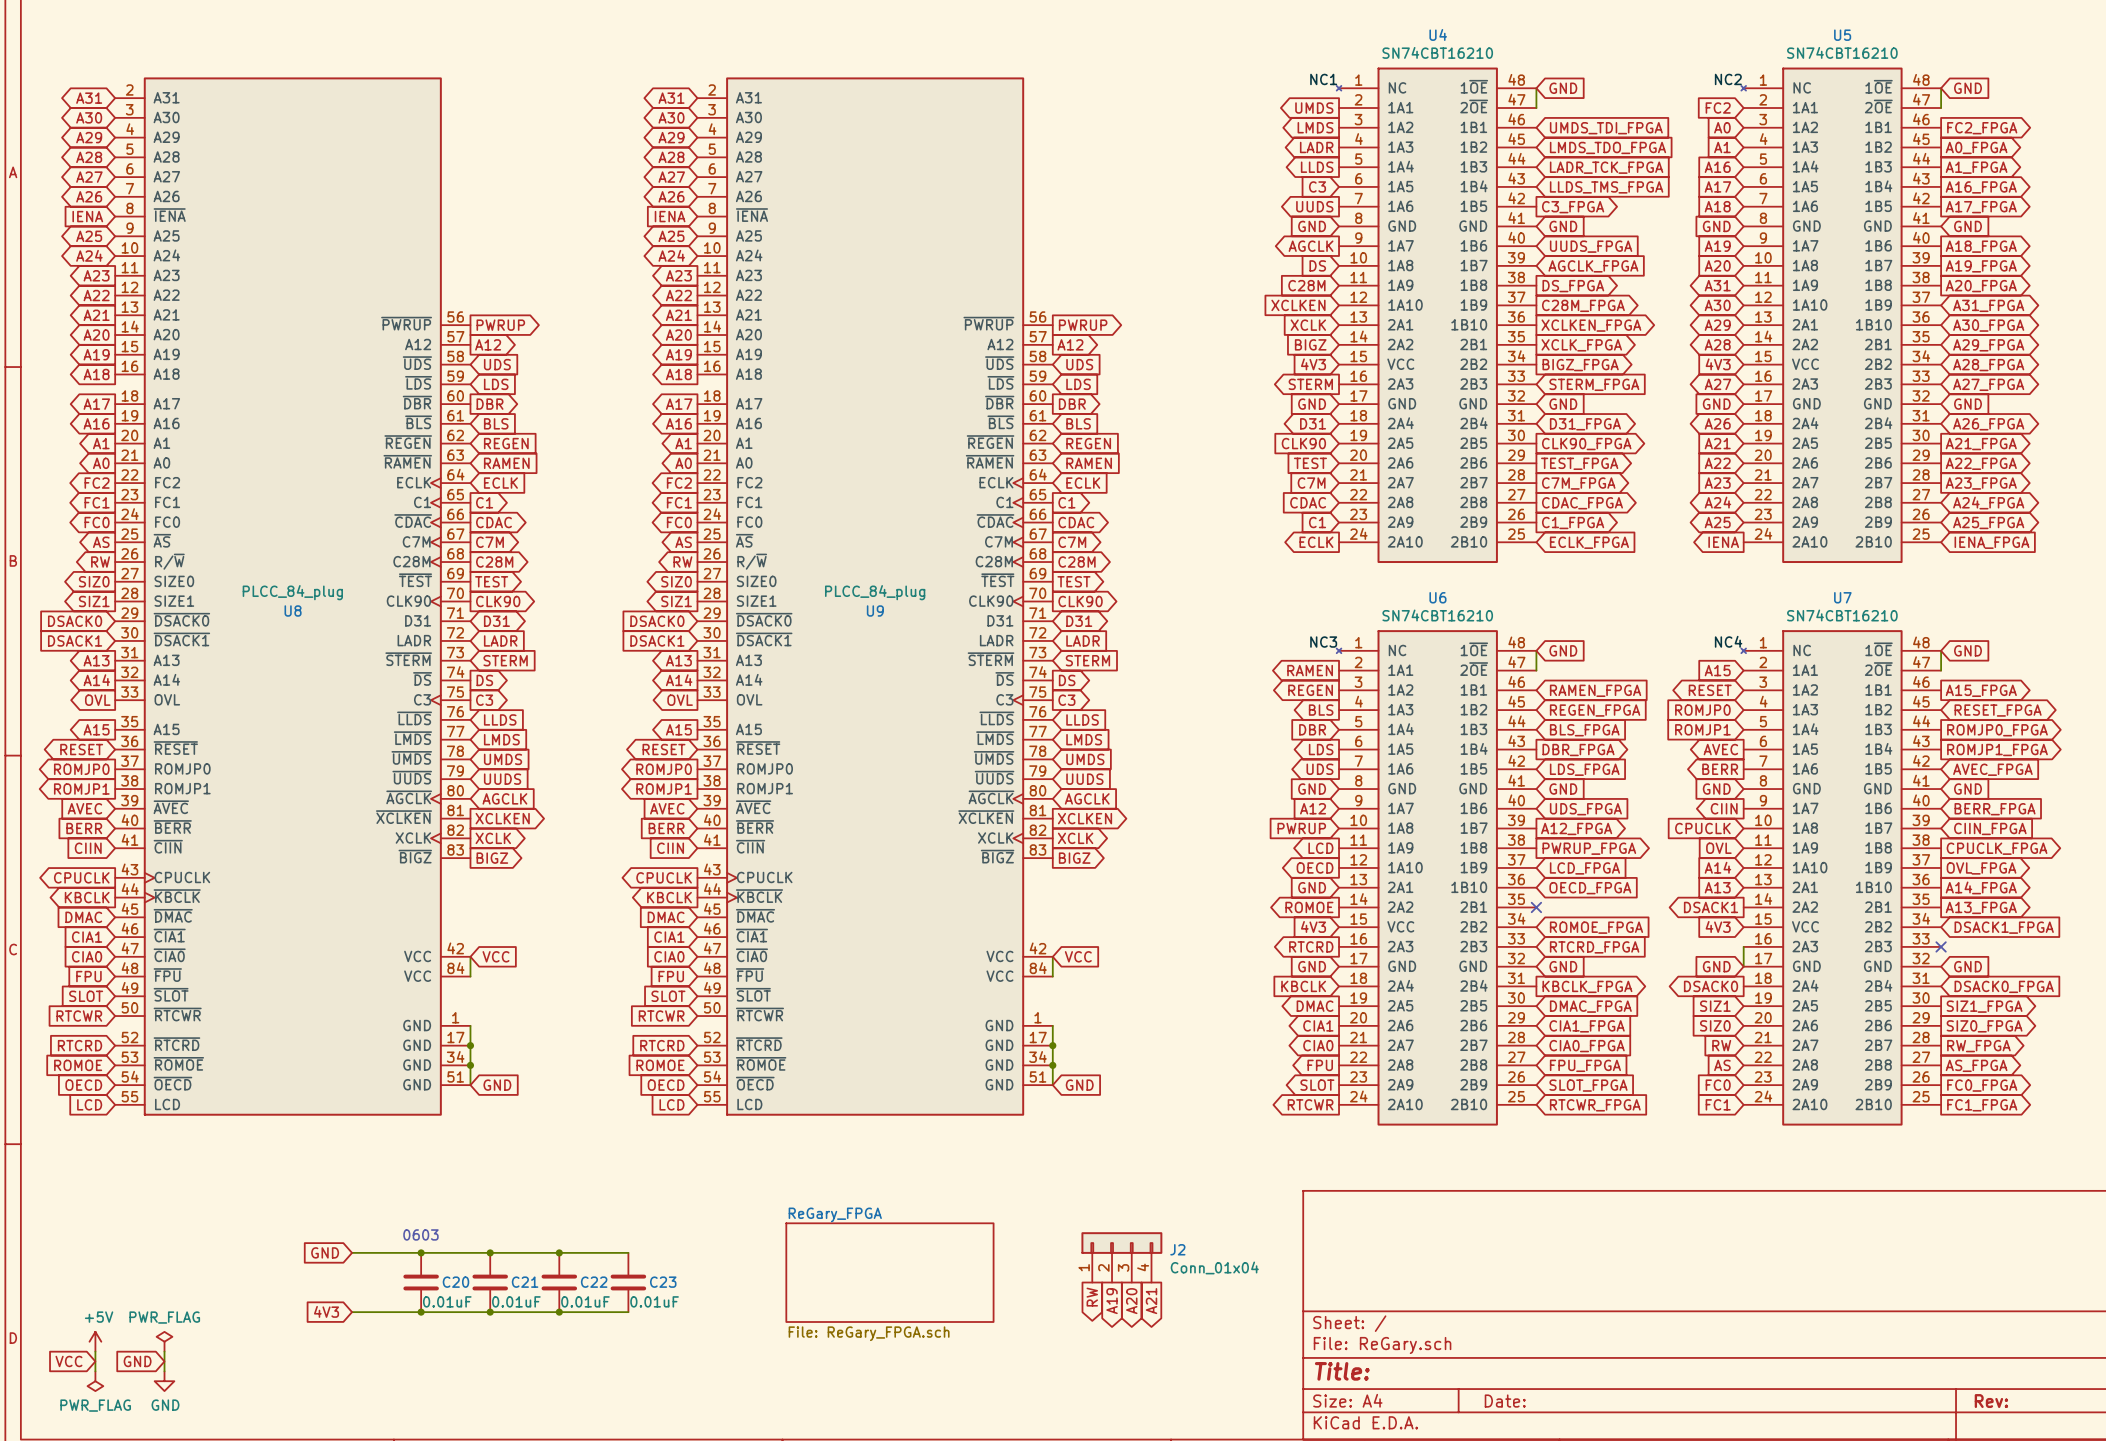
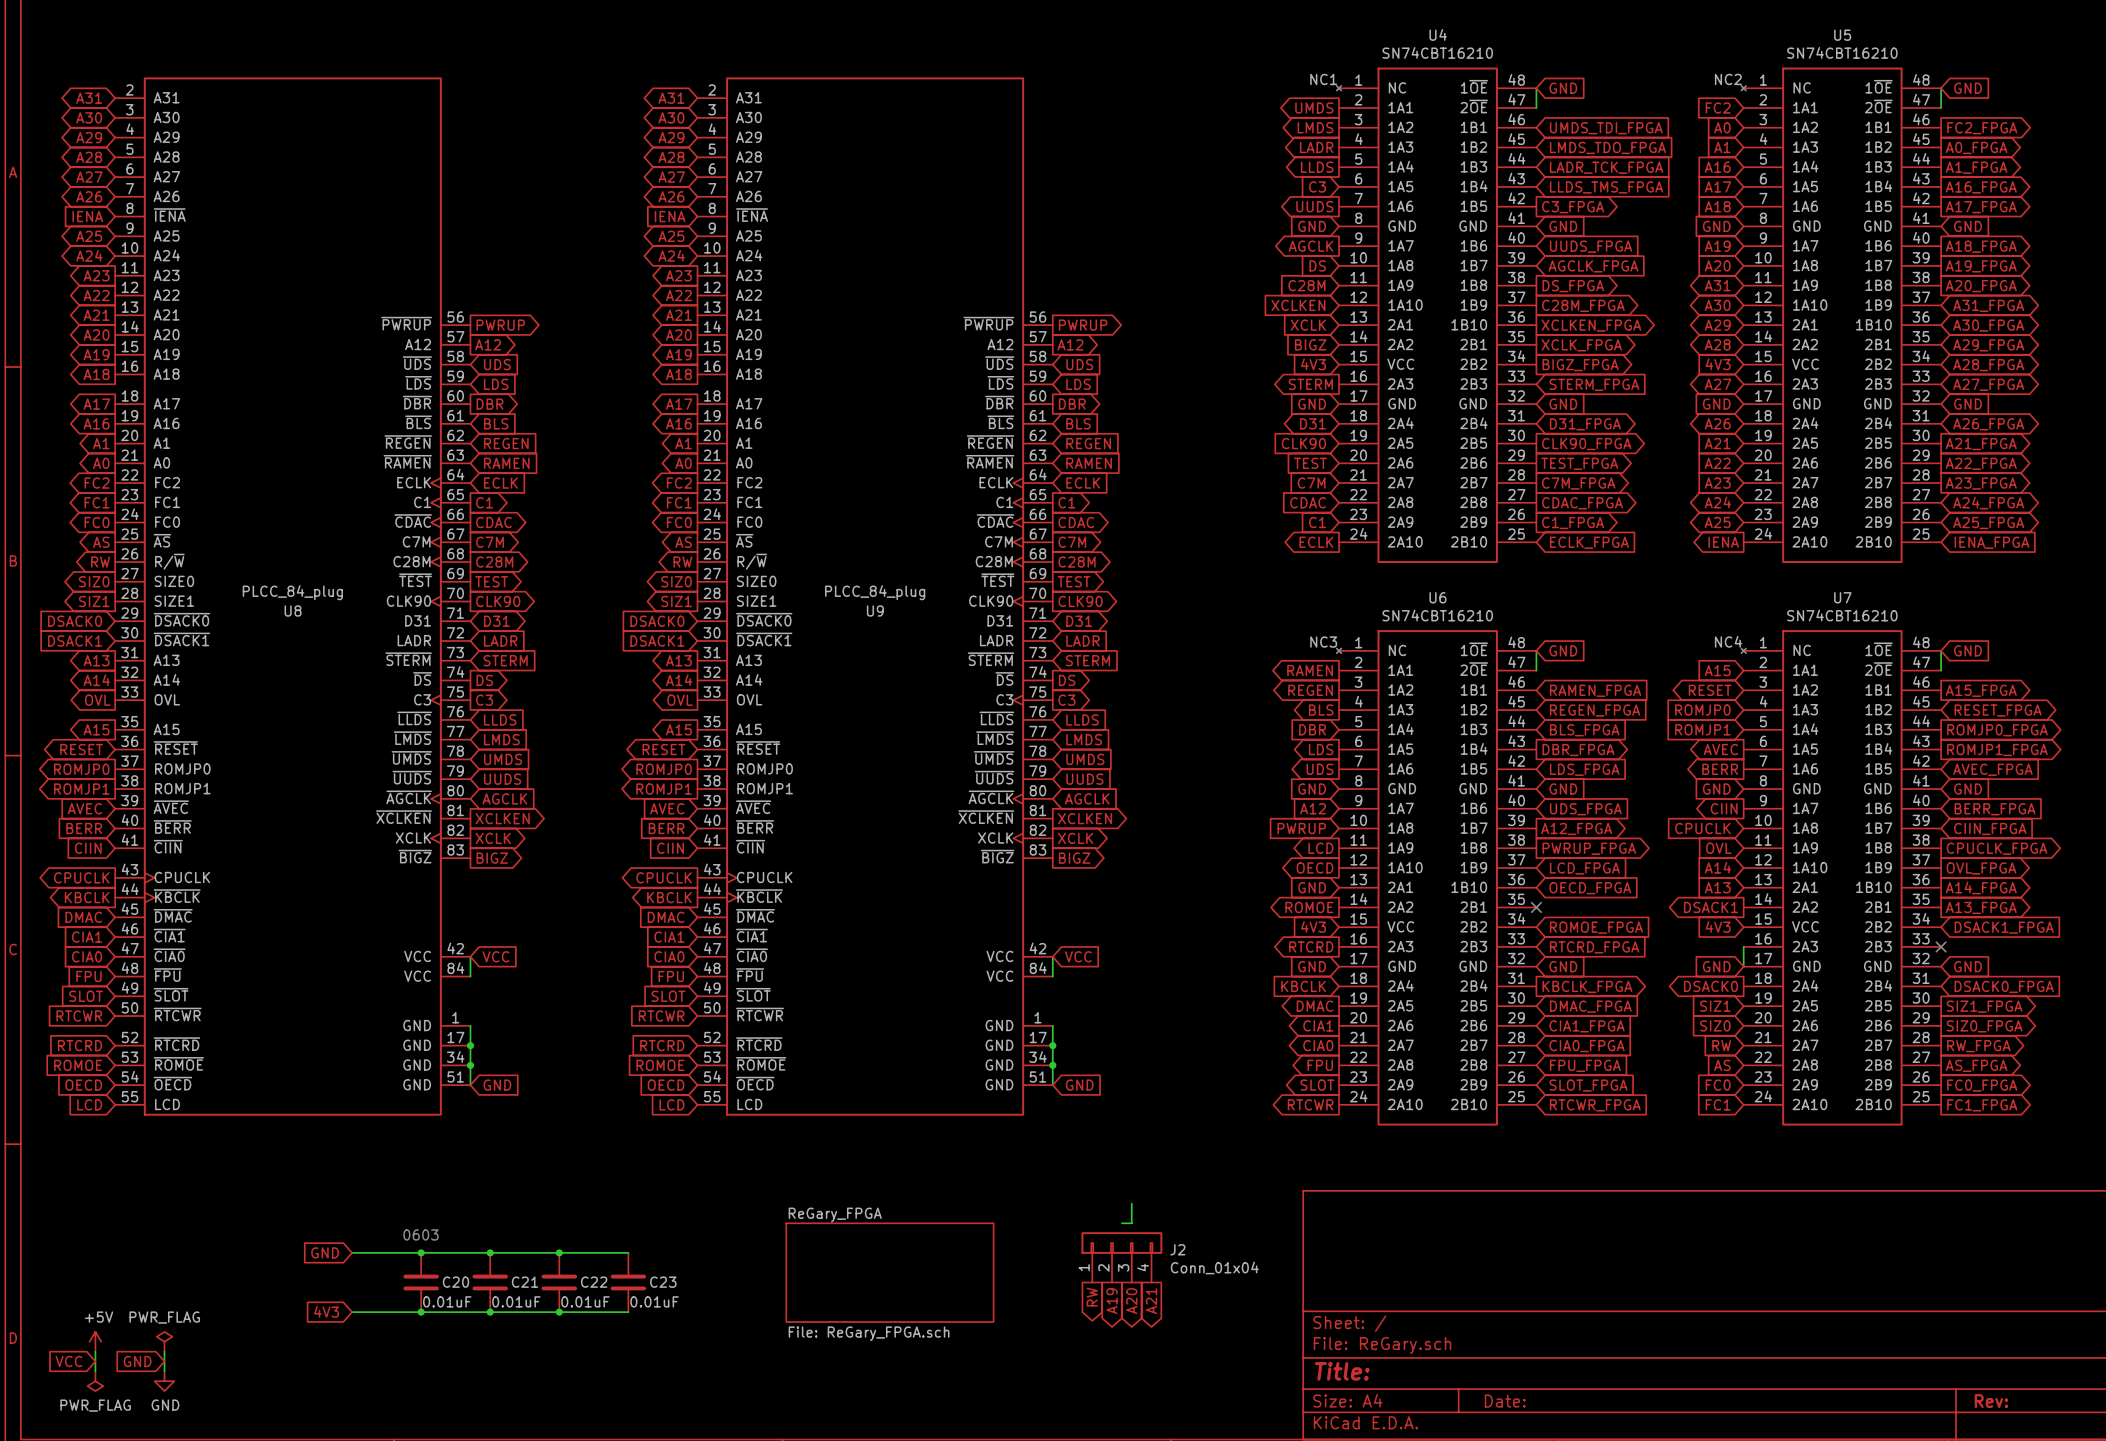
wire: none -> (1131, 1203) (1131, 1223) (1121, 1223)

